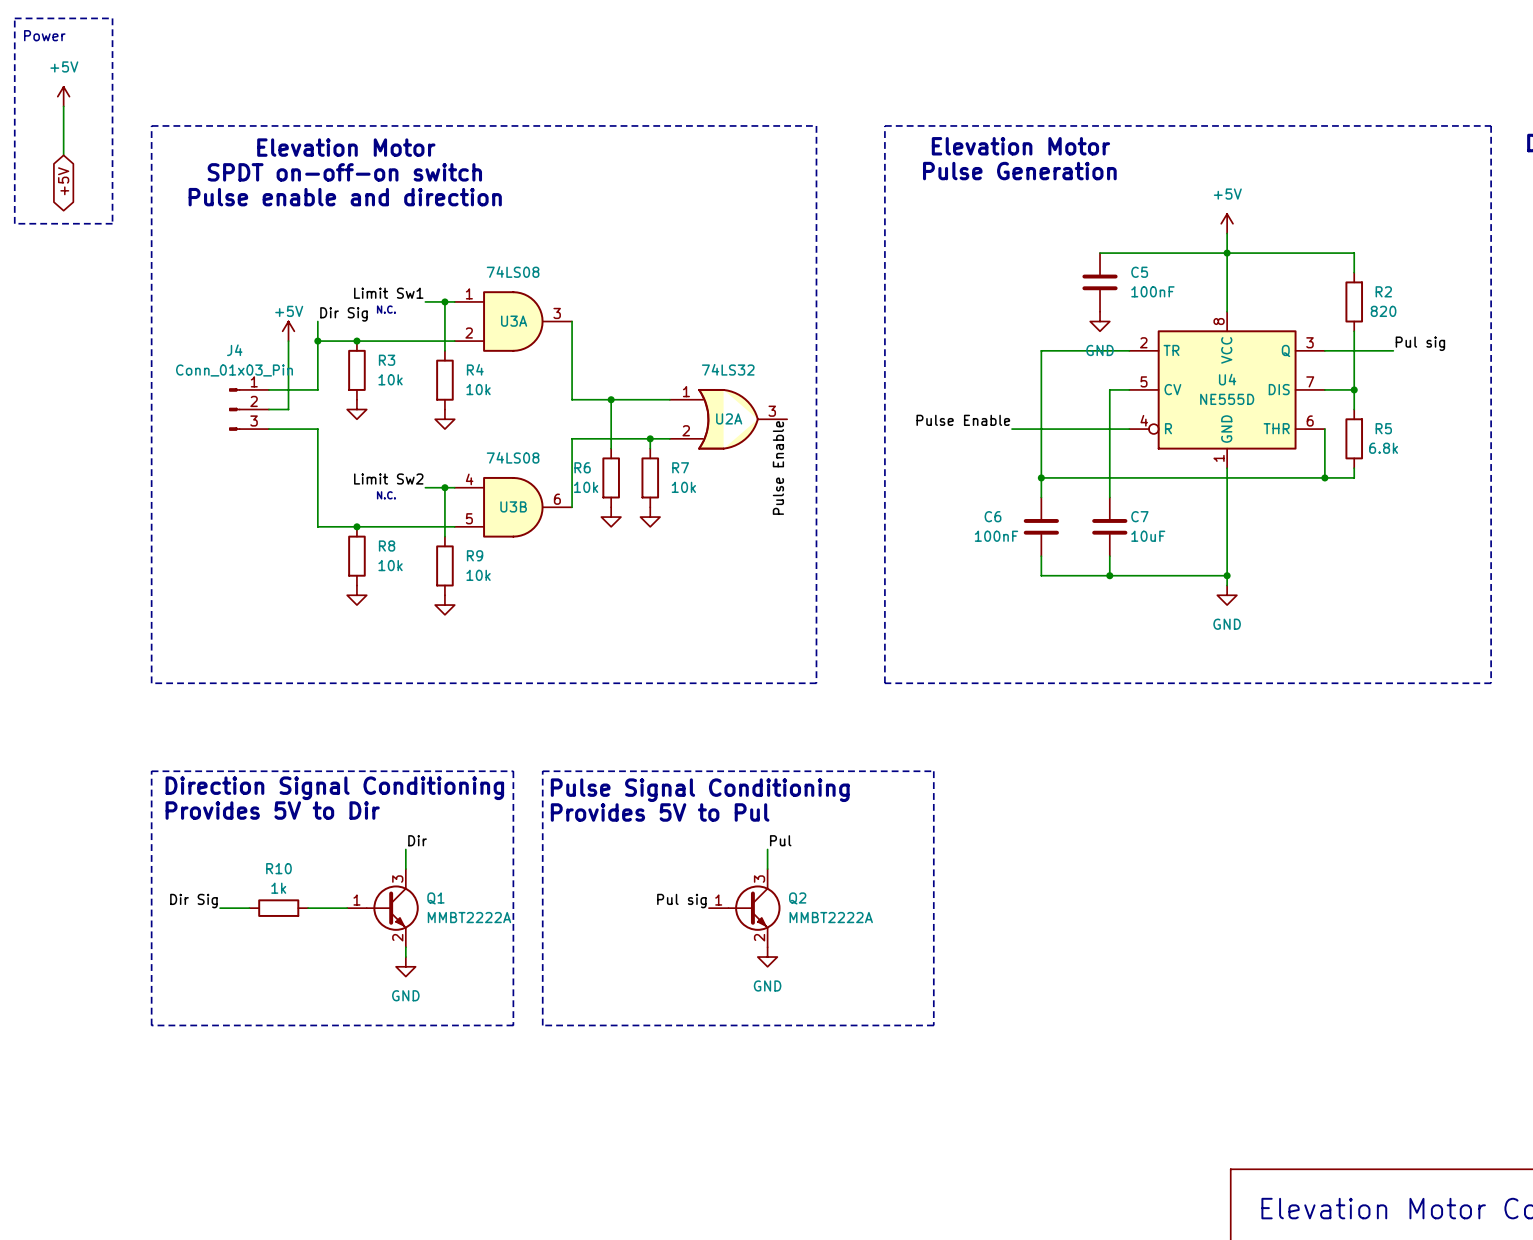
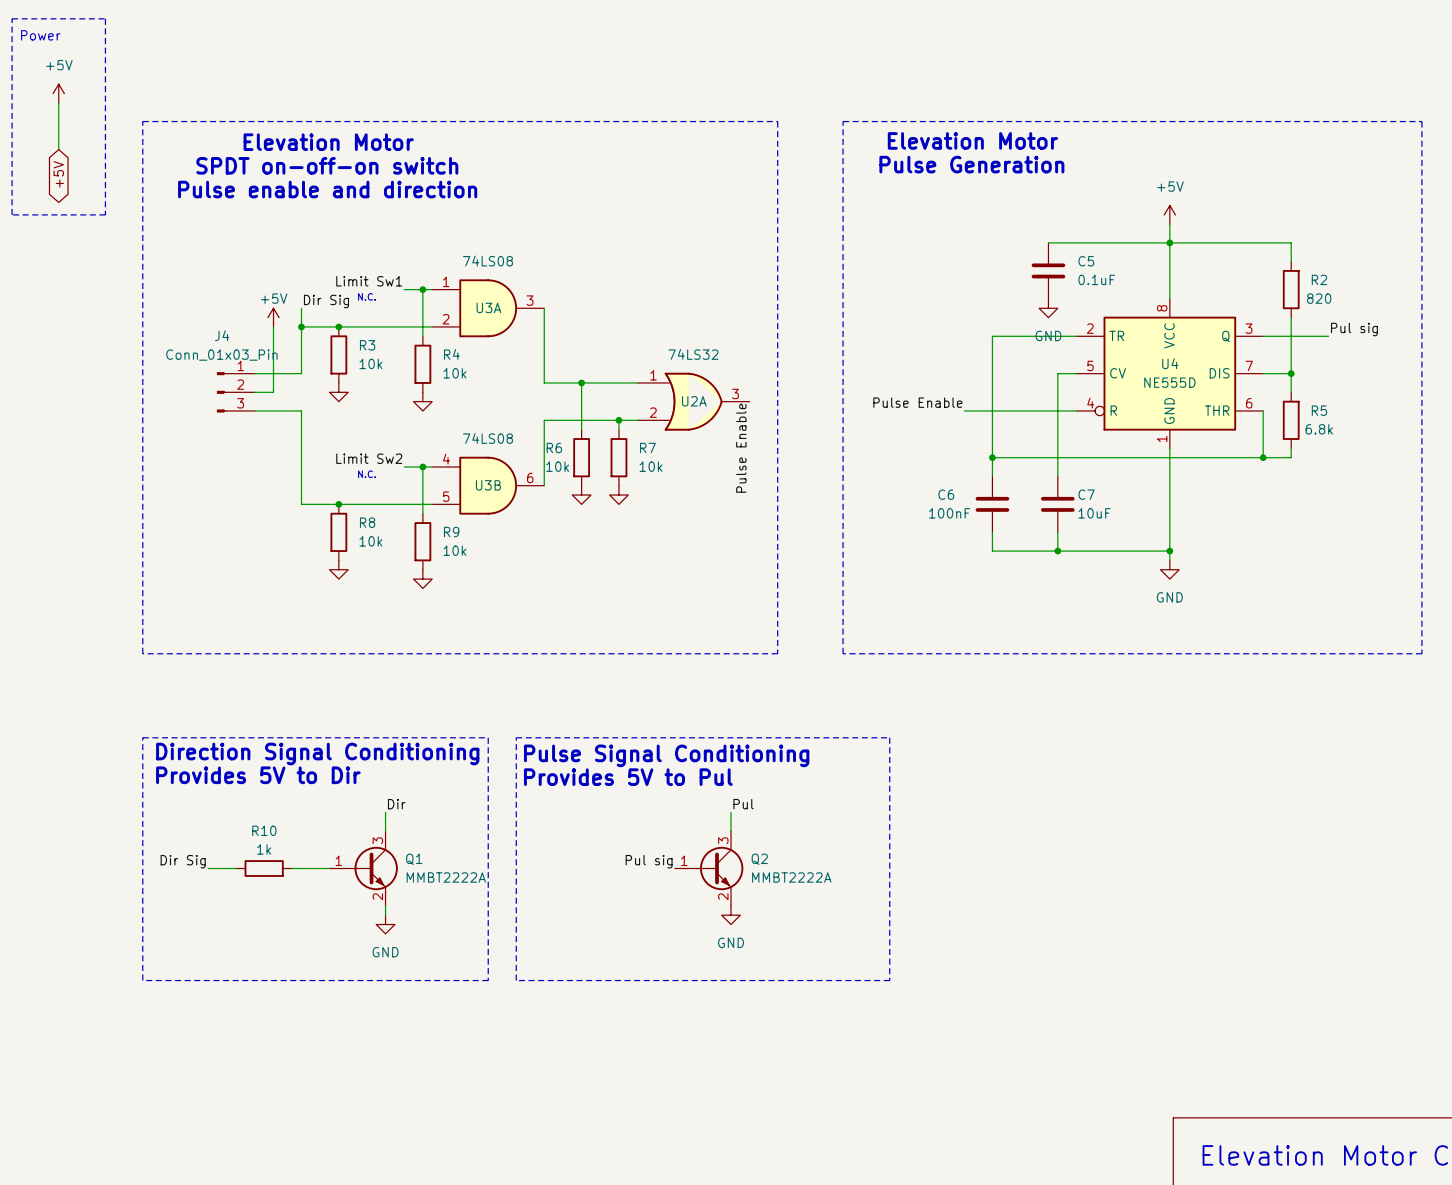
C5 value: 100nF (1152, 291) -> 0.1uF (1096, 279)

